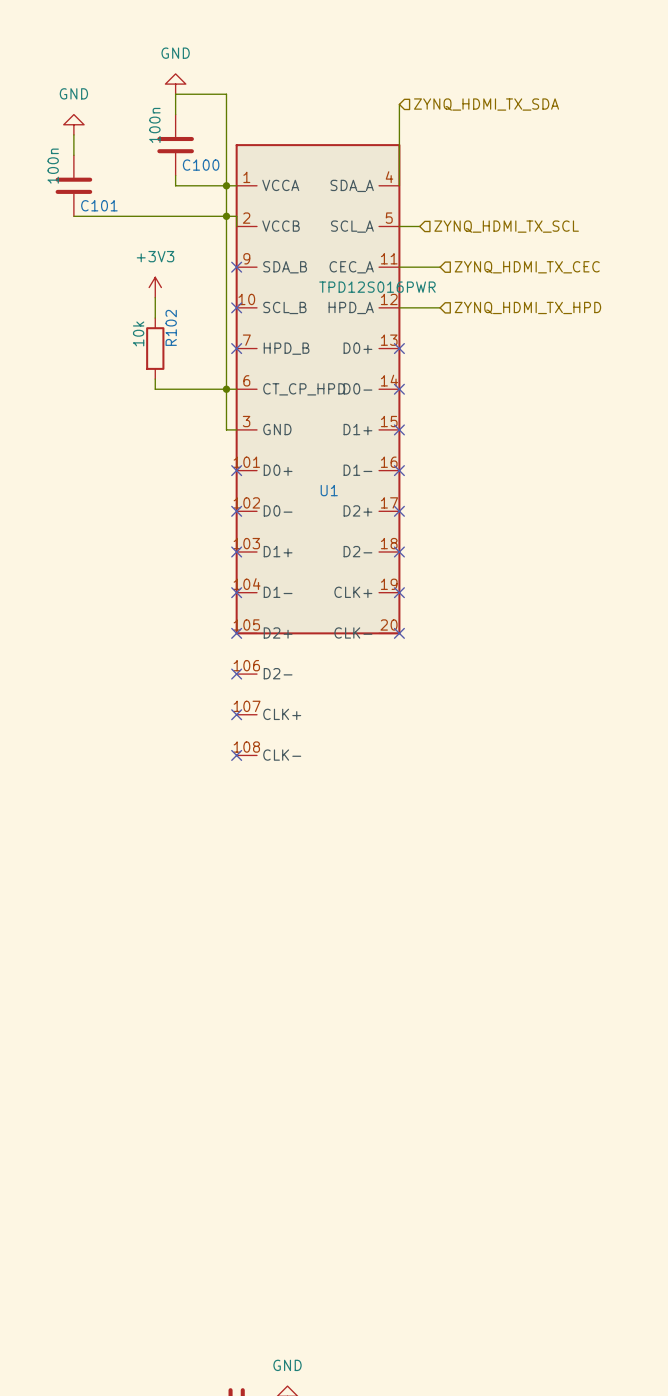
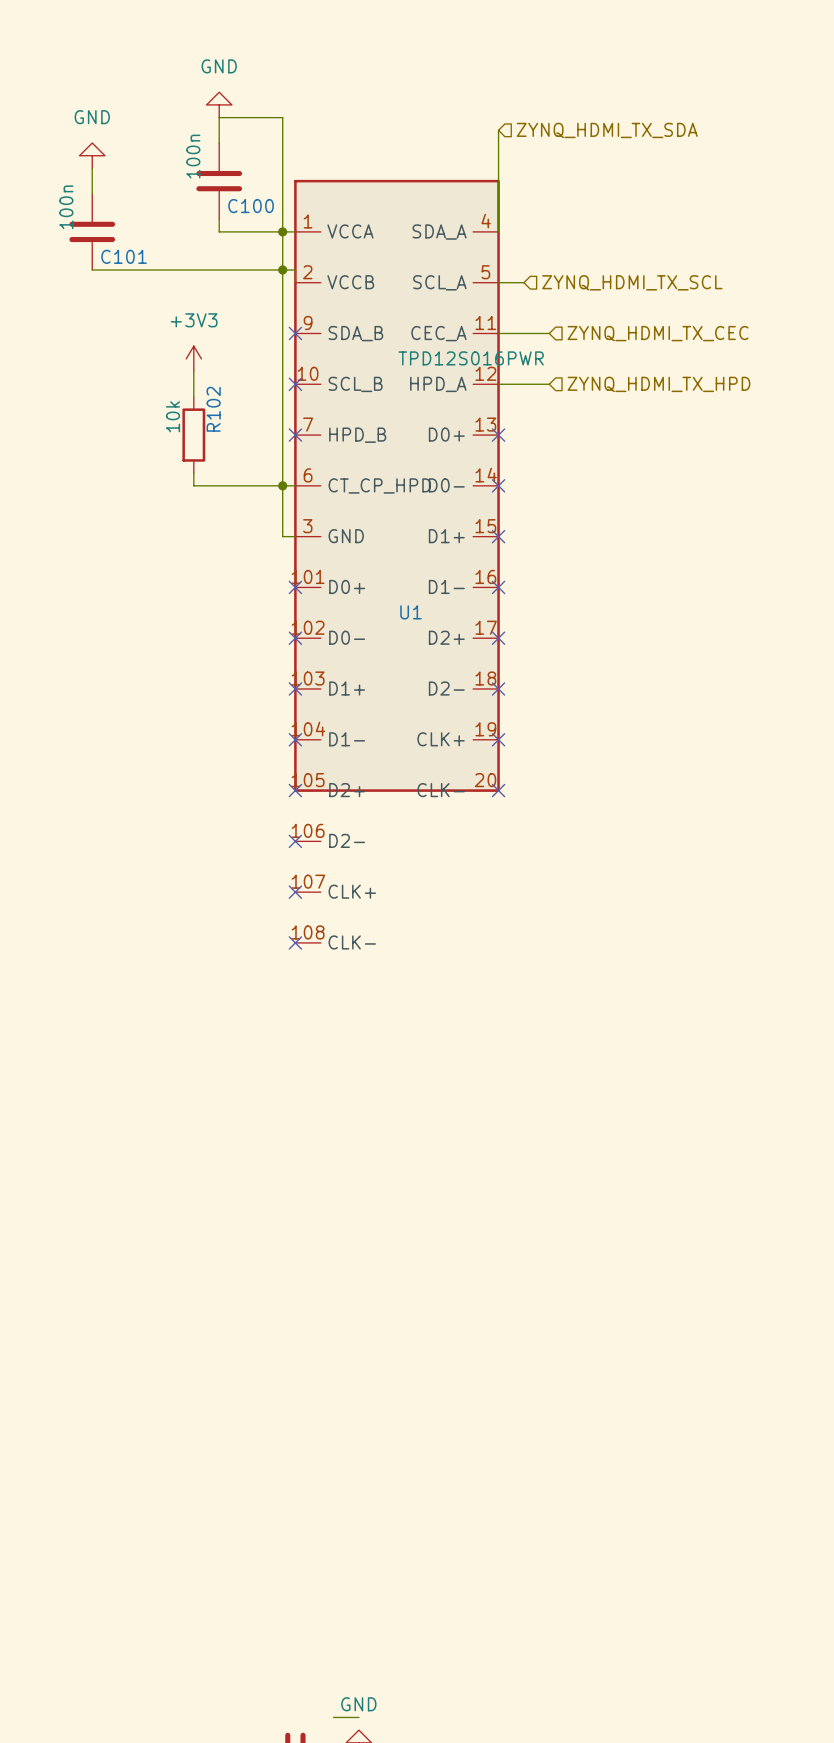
wire: none -> (333, 1717) (358, 1717)

